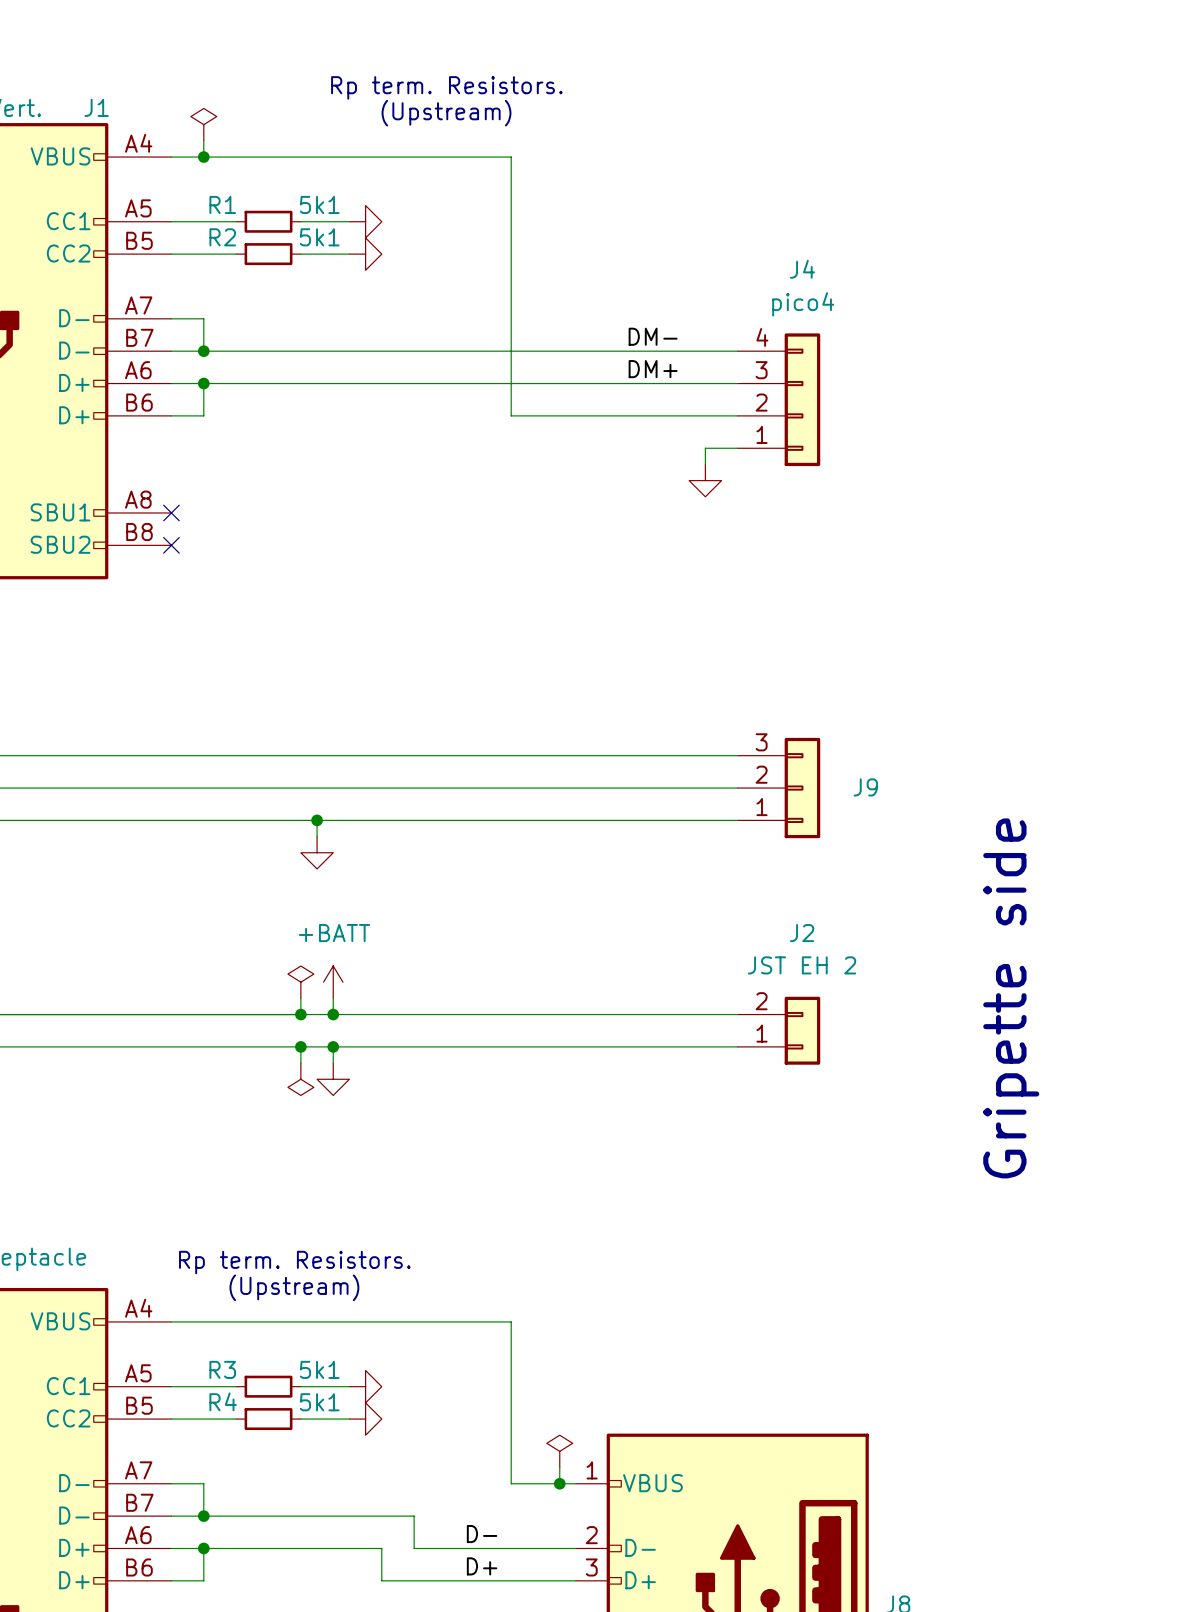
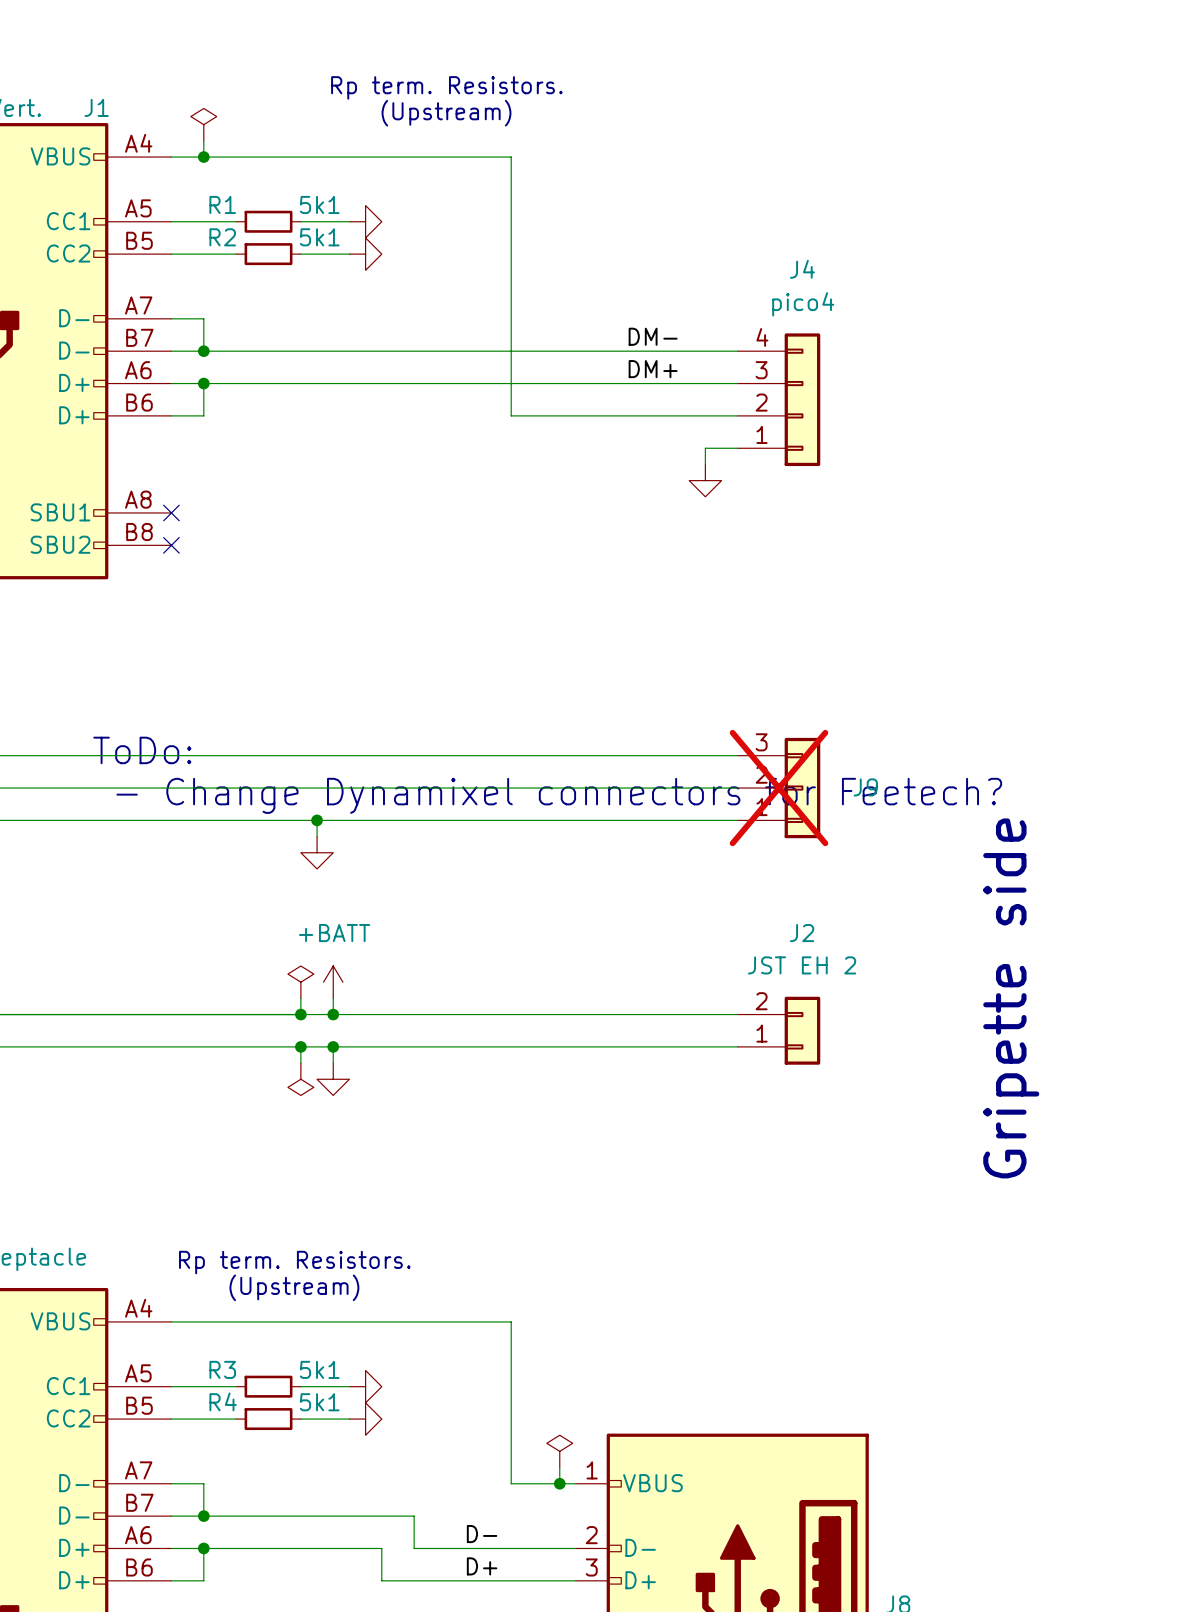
text: none -> ToDo: (142, 750)
J9 do-not-place cross: none -> (778, 788)
text: none -> - Change Dynamixel connectors for Feetech? (559, 795)

